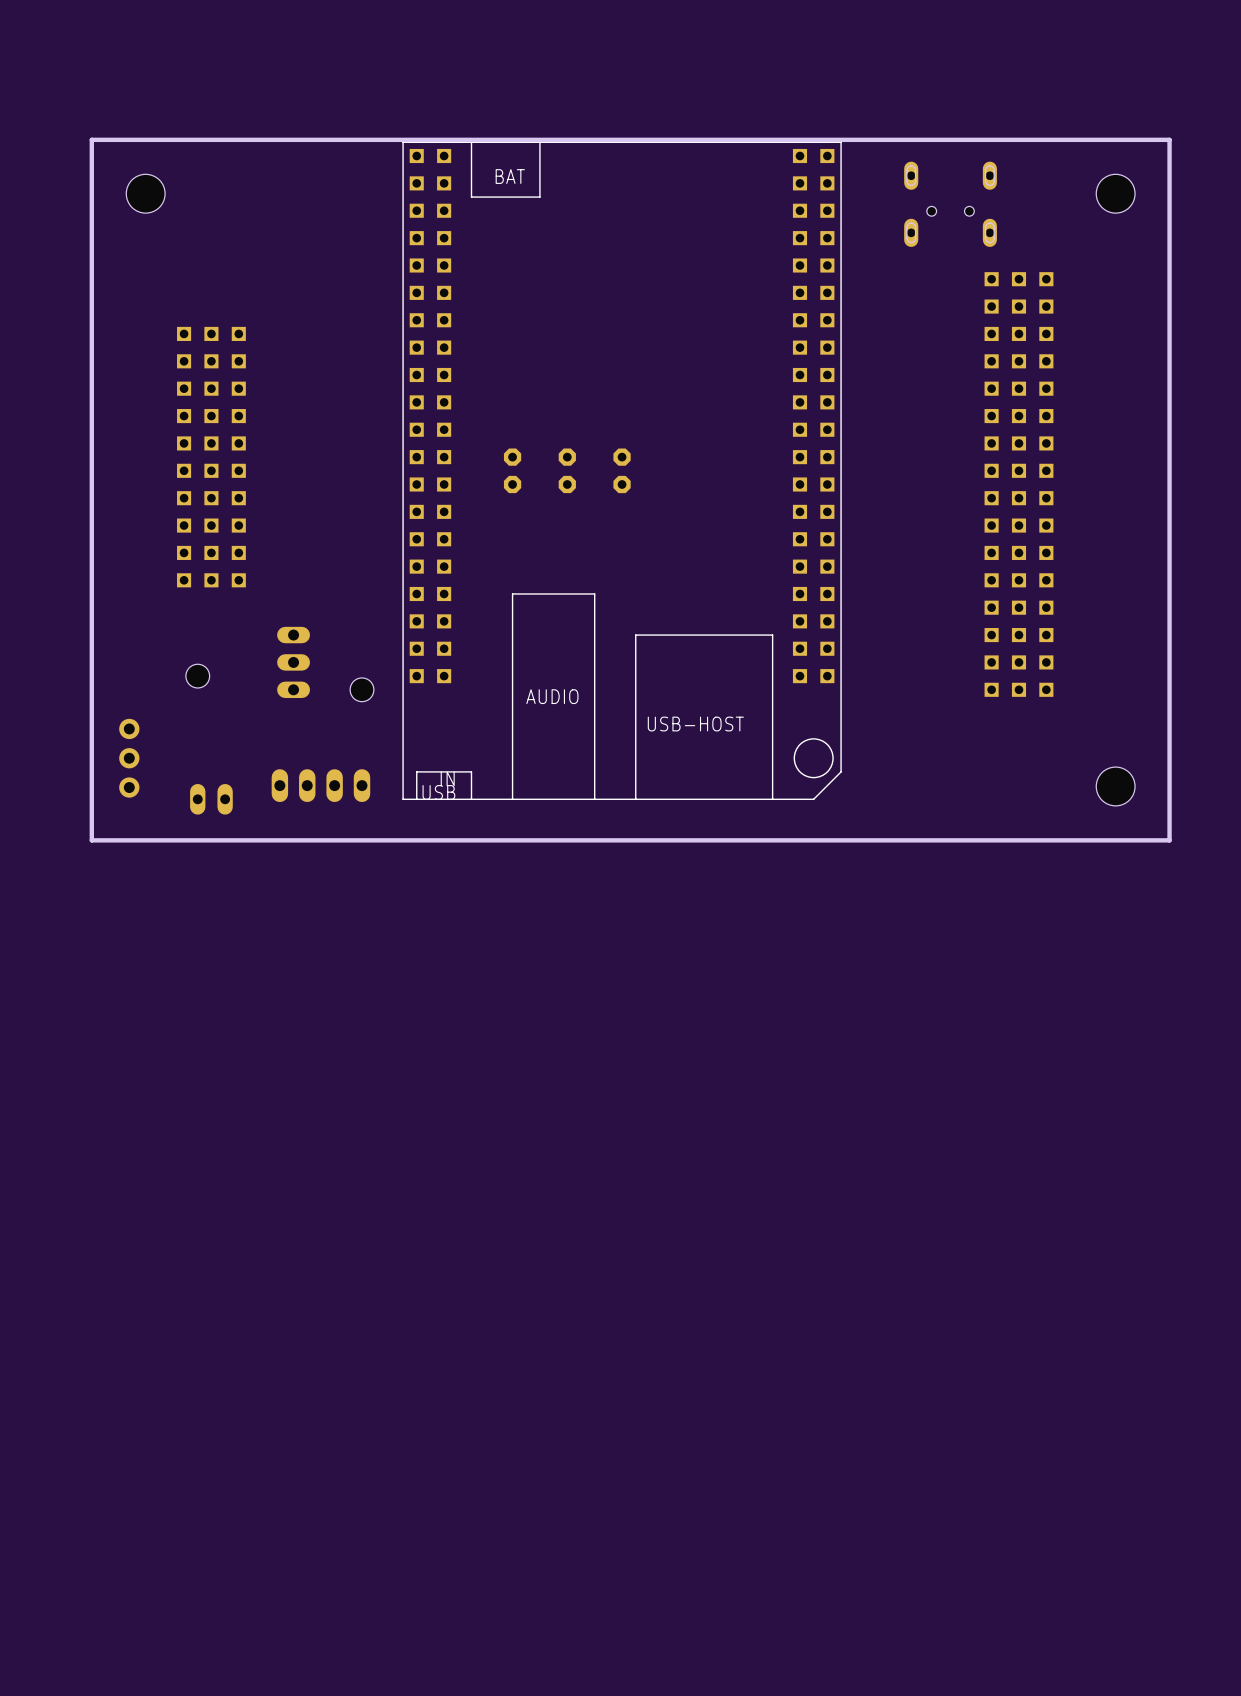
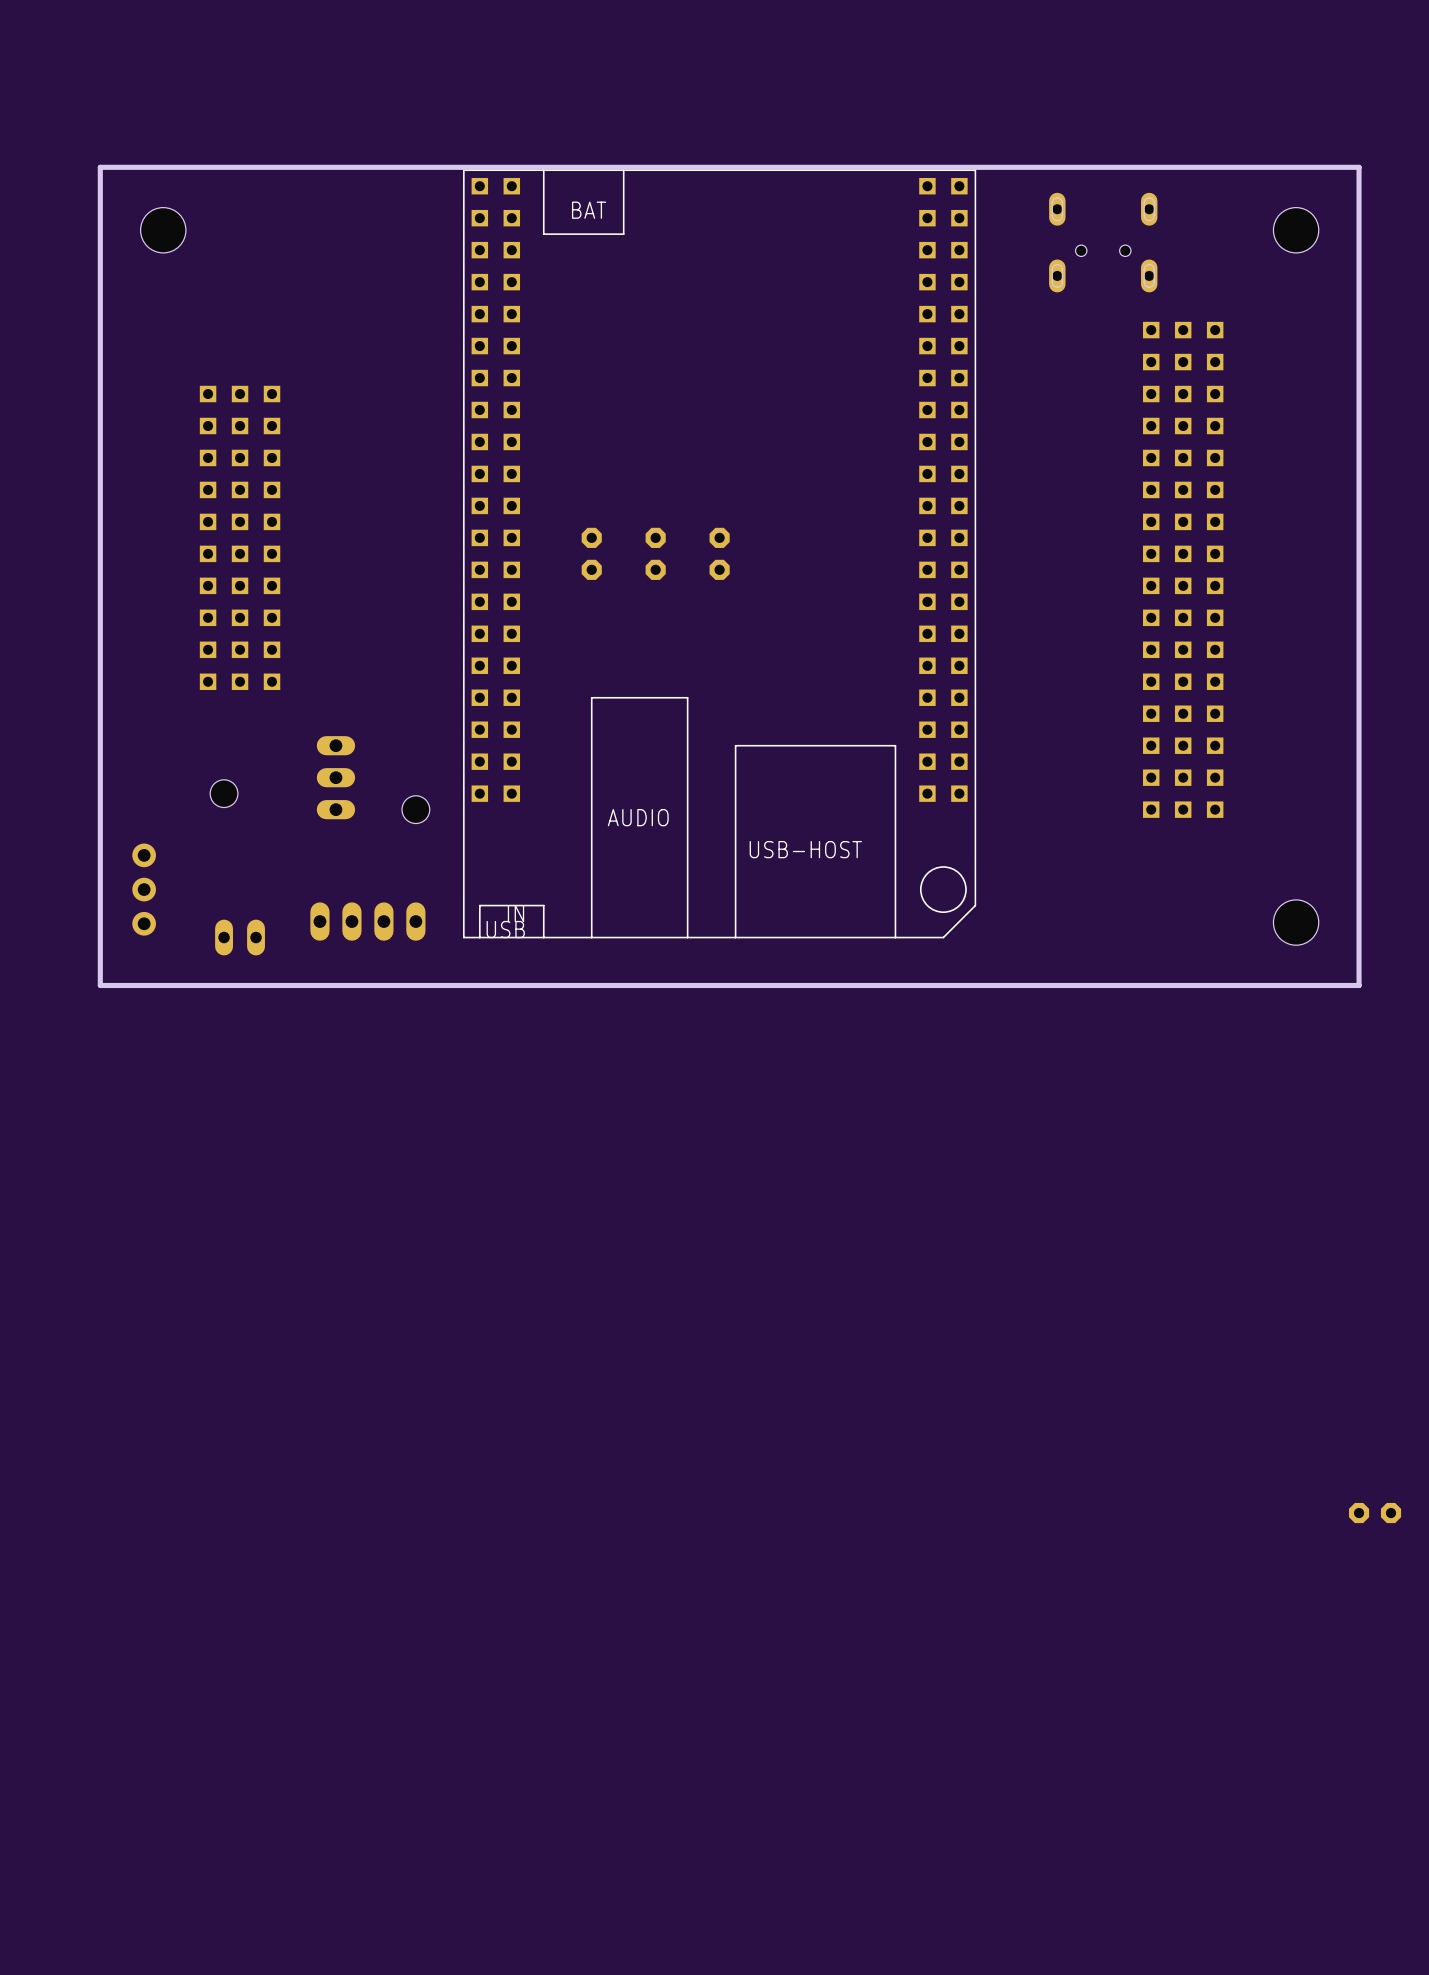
part: none -> (1375, 1513)

